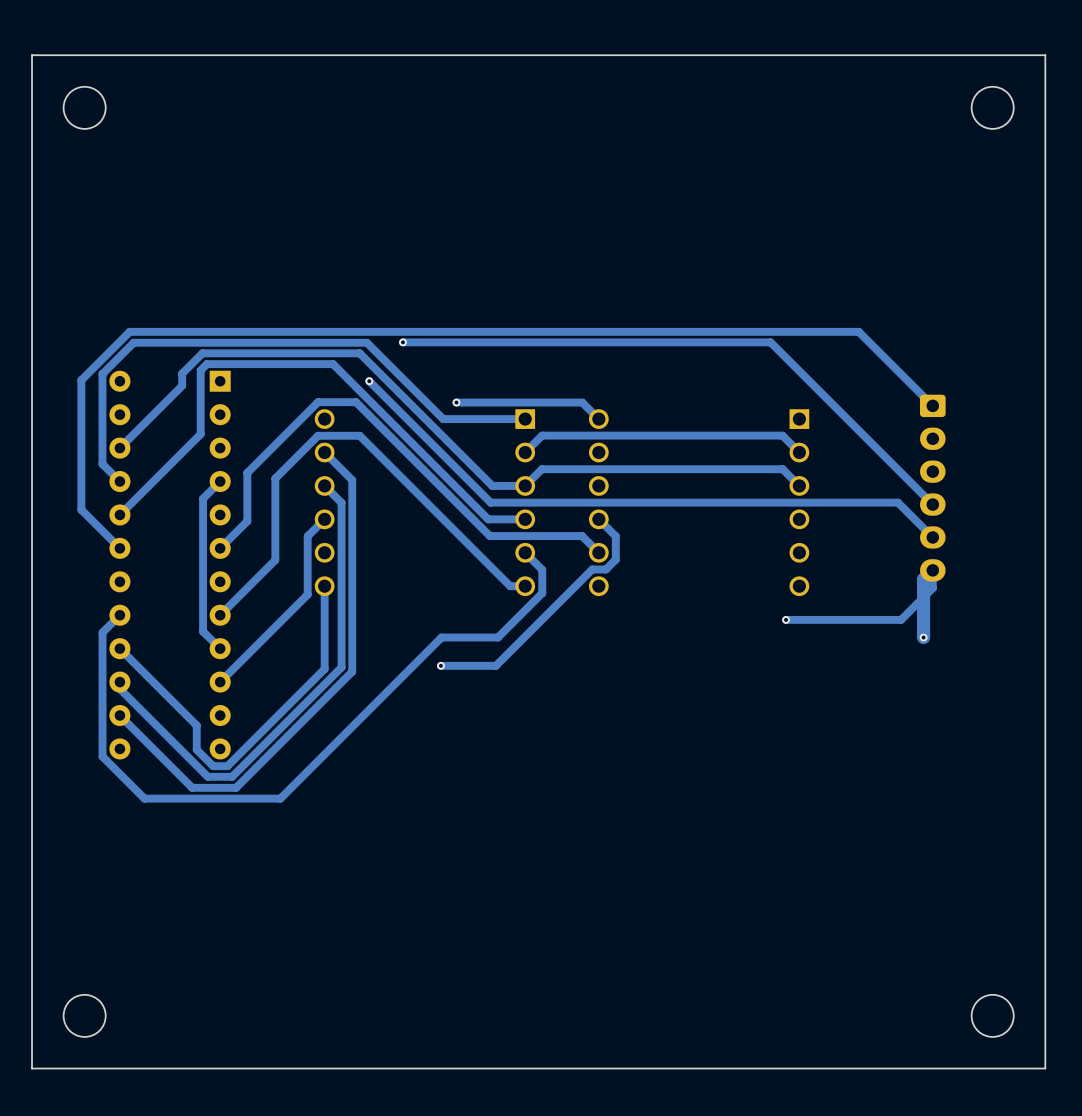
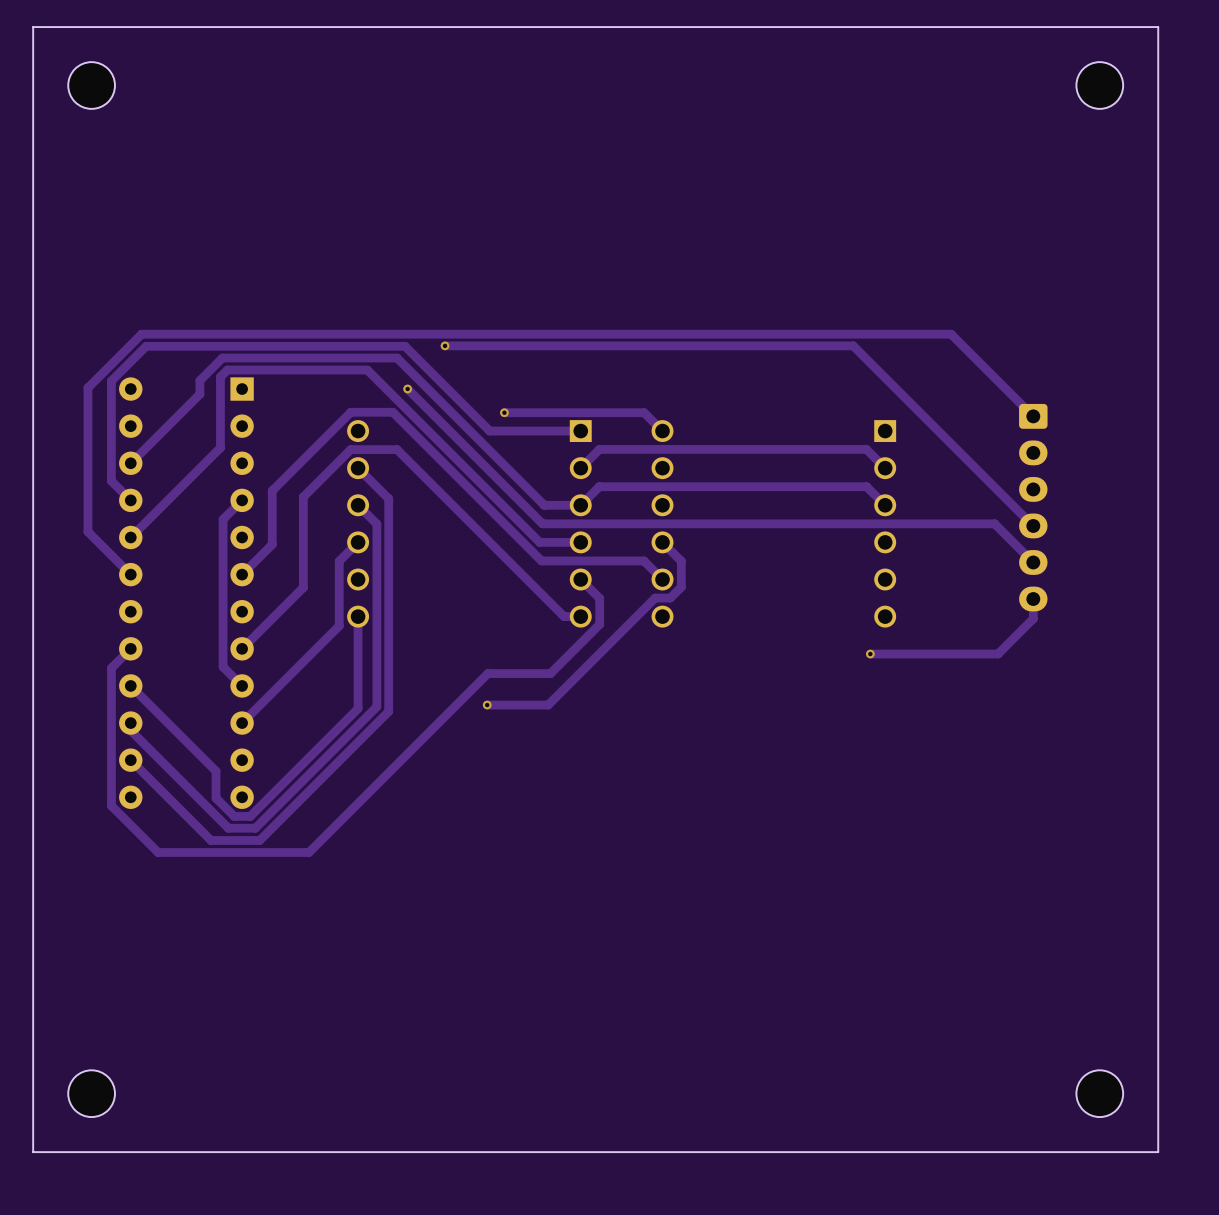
track: (932, 570) (923, 579) (923, 637) -> none
via: (923, 637) -> none

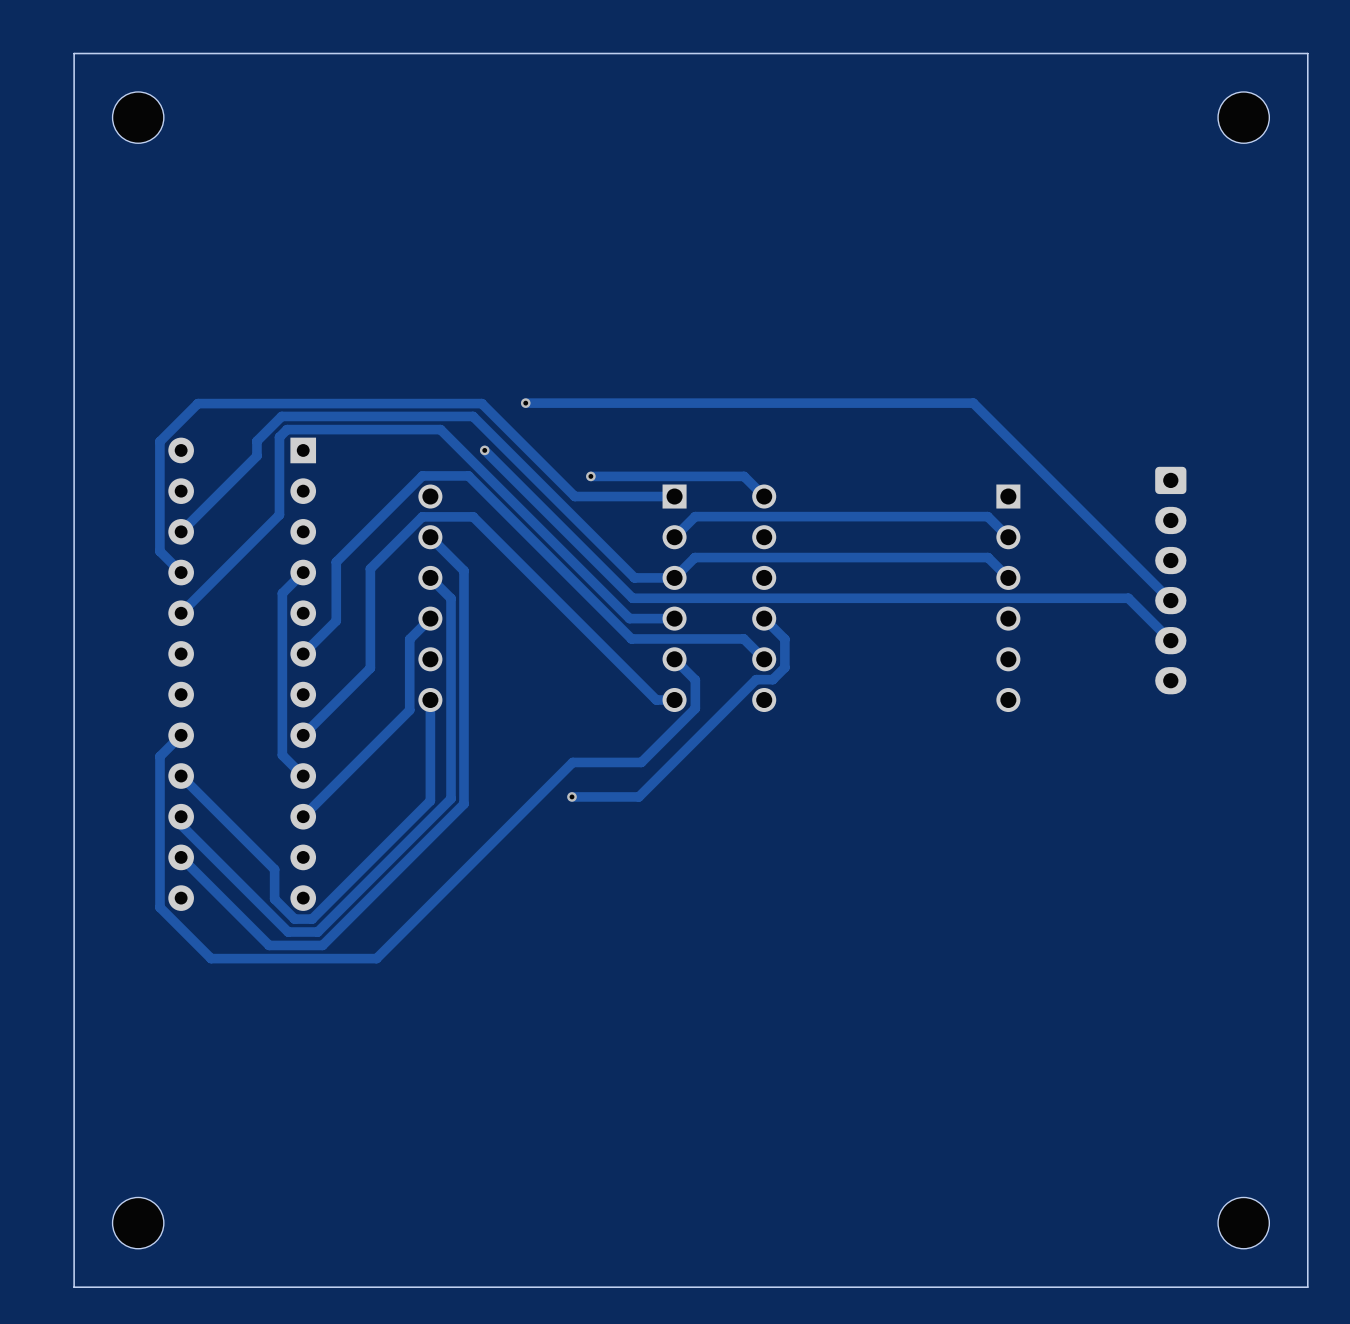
track: (1033, 416) (951, 334) (141, 334) (87, 387) (87, 531) (130, 574) -> none
track: (1033, 599) (1033, 618) (998, 654) (870, 654) -> none
via: (870, 654) -> none

